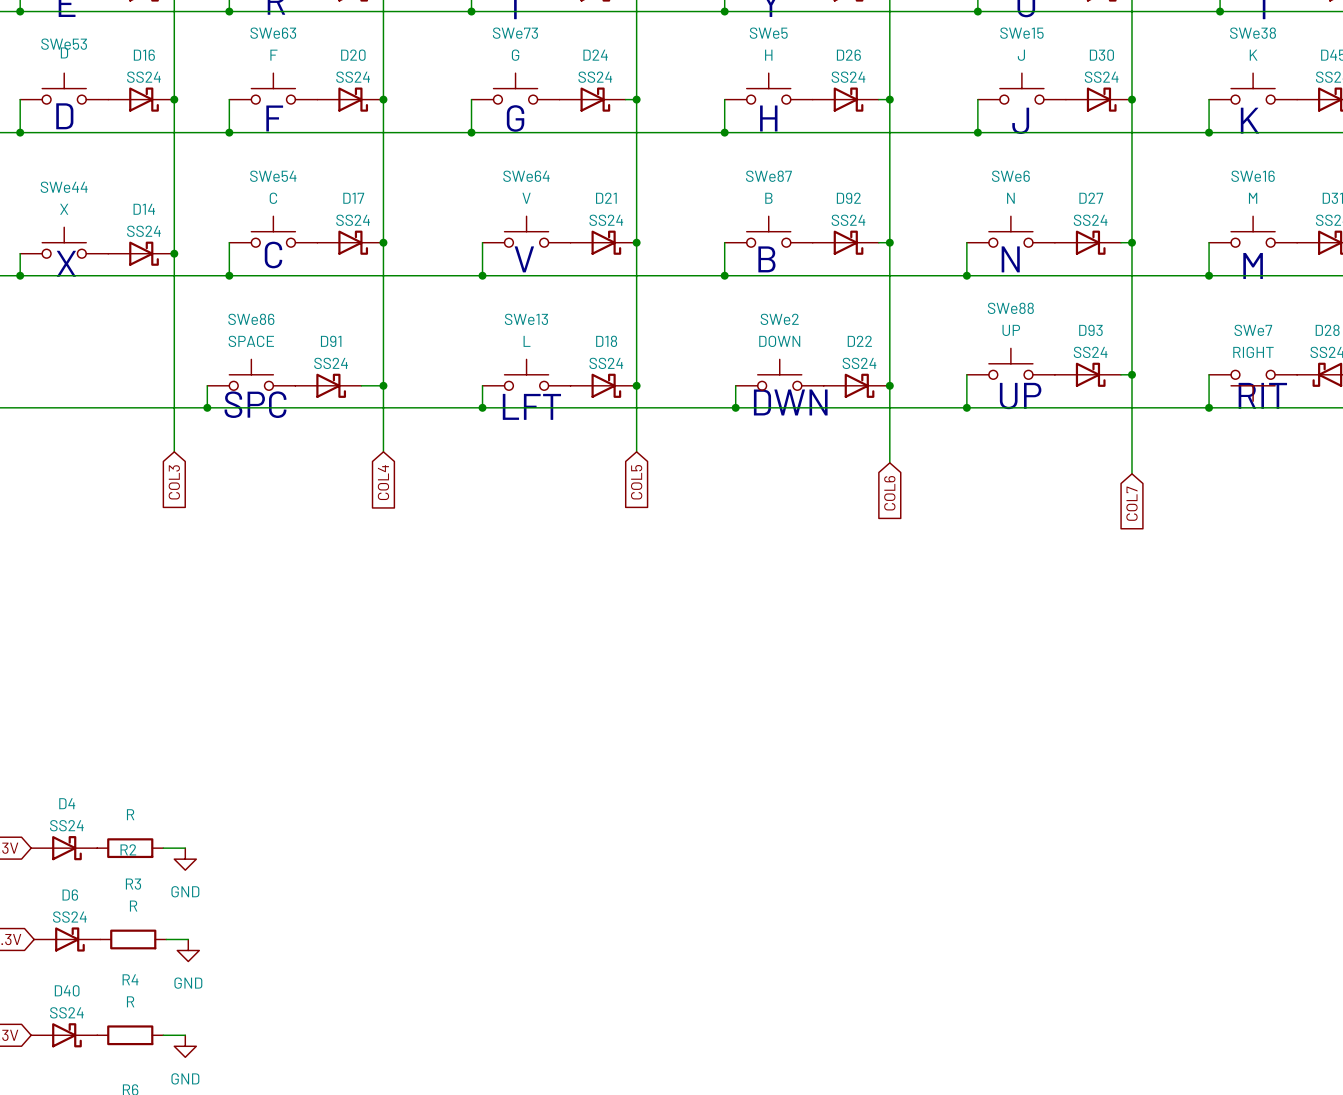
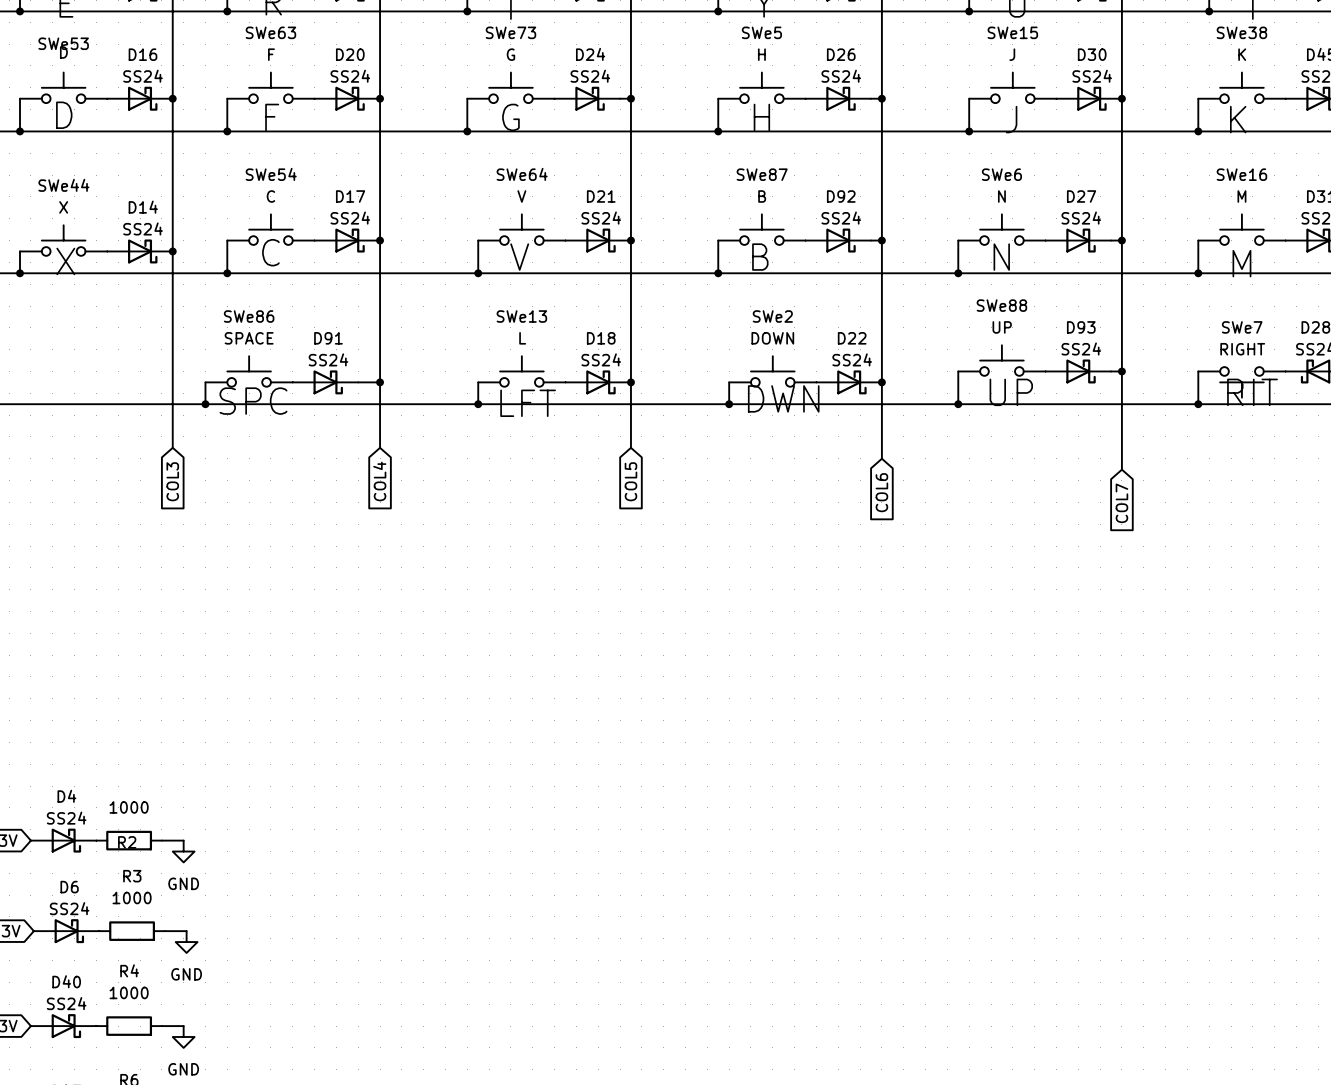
R2 value: R (130, 814) -> 1000 (129, 807)
R3 value: R (133, 906) -> 1000 (132, 898)
R4 value: R (130, 1001) -> 1000 (129, 992)

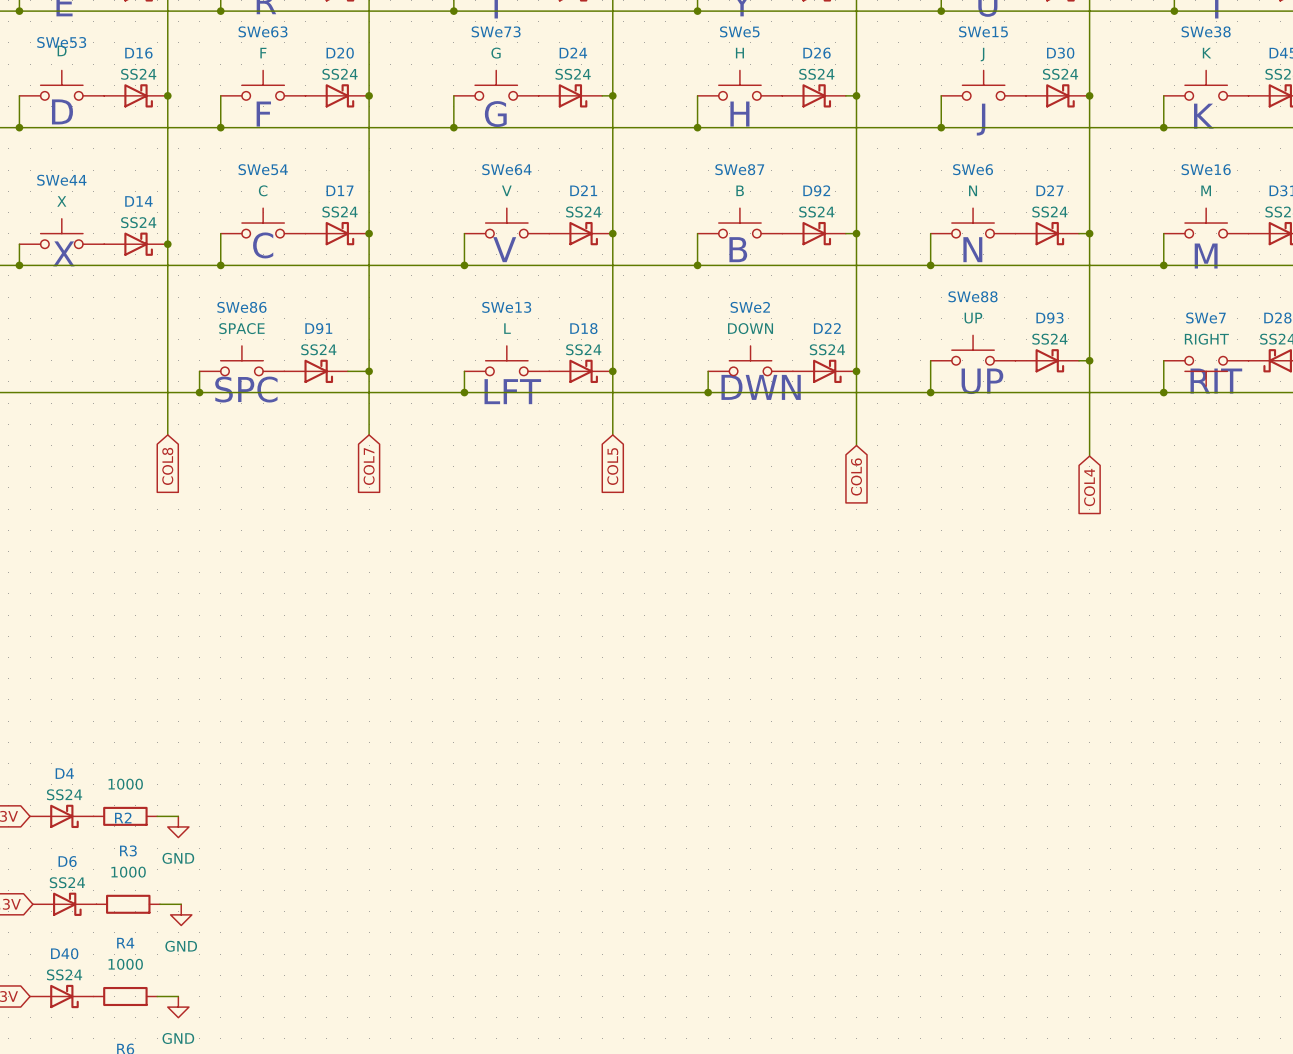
global label: COL3 (172, 481) -> COL8 (167, 466)
global label: COL4 (379, 481) -> COL7 (369, 466)
global label: COL7 (1121, 503) -> COL4 (1089, 487)

